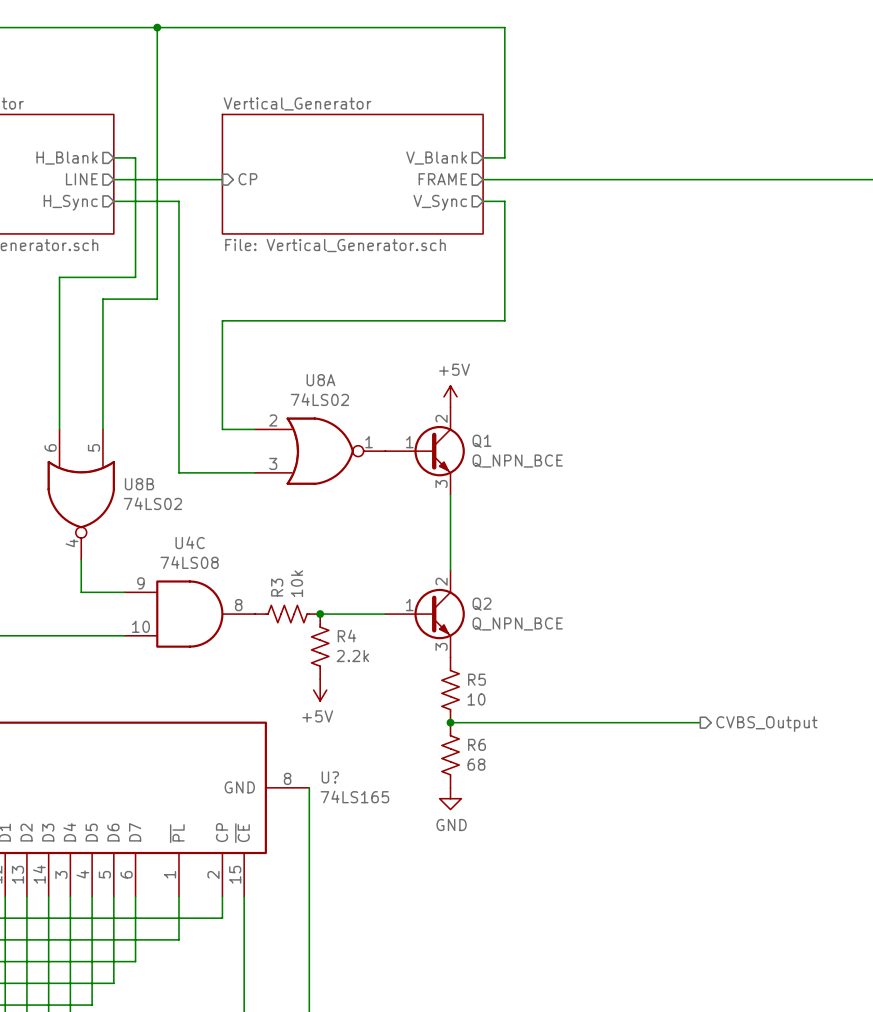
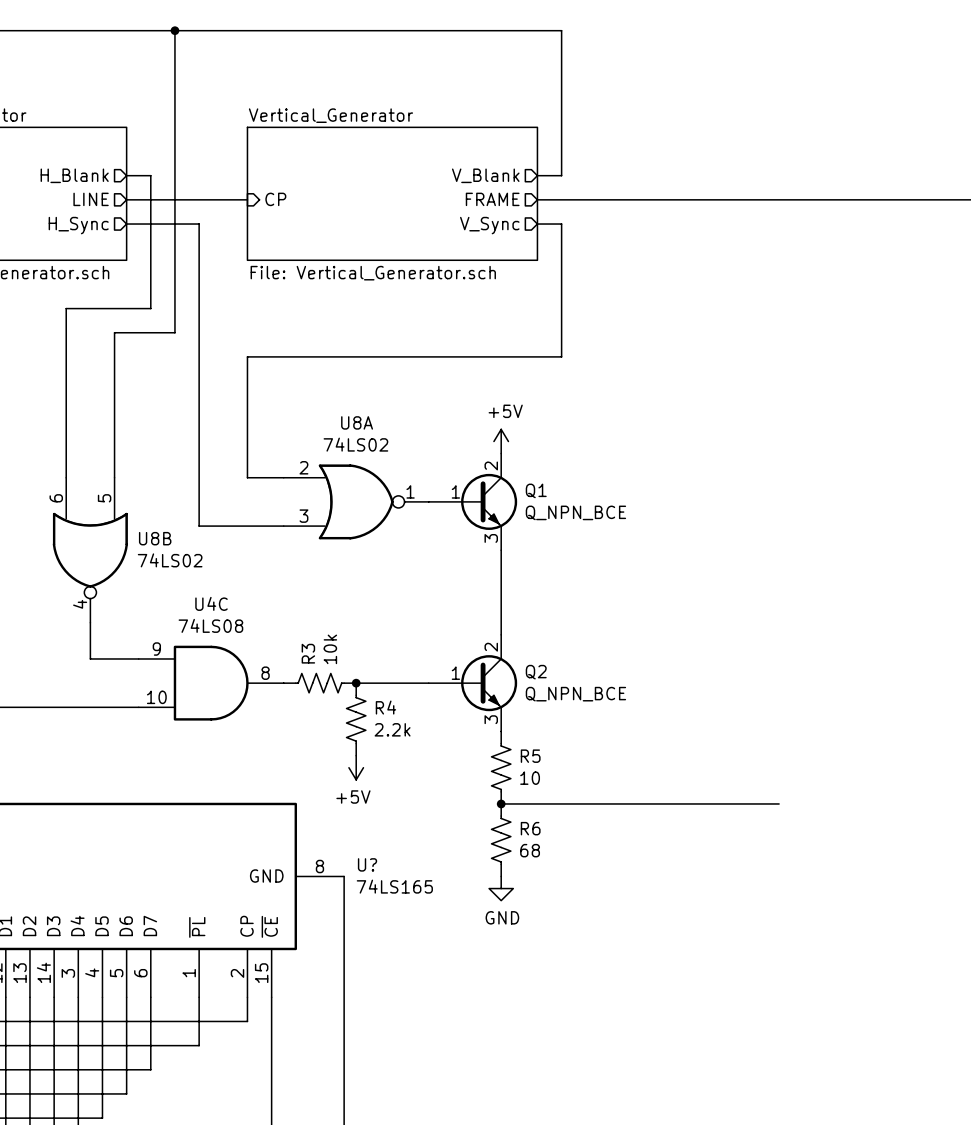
hierarchical label: CVBS_Output (766, 724) -> none

